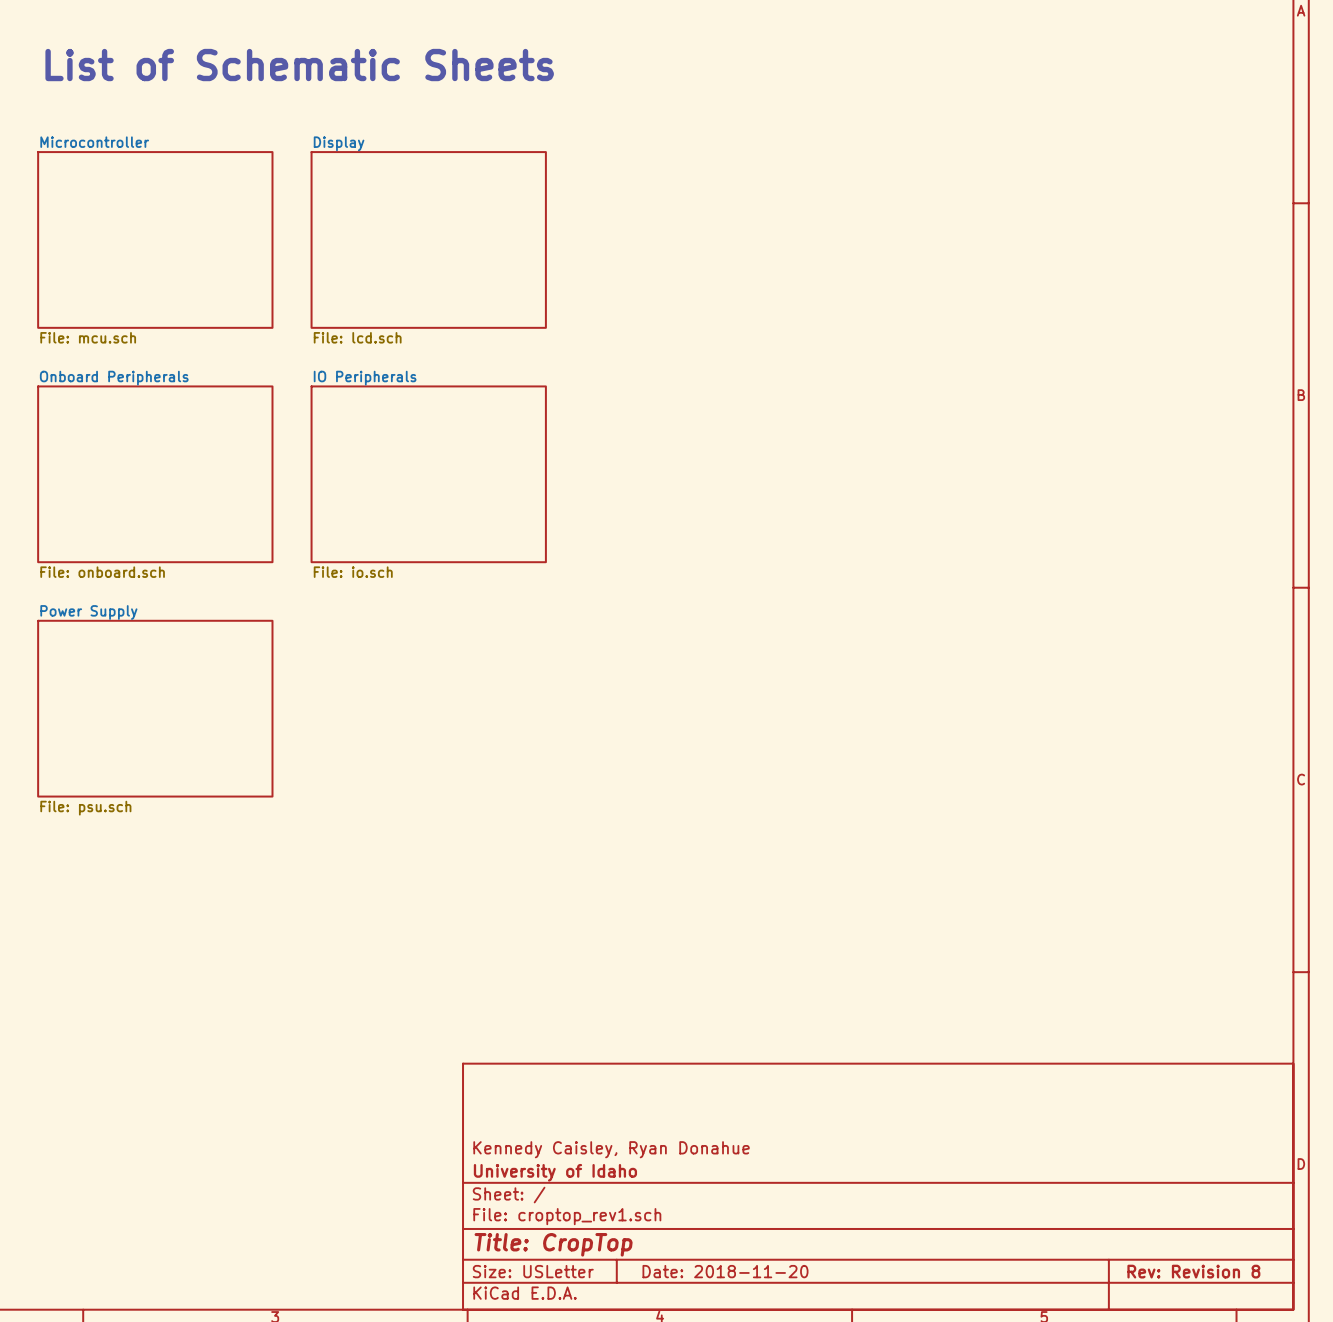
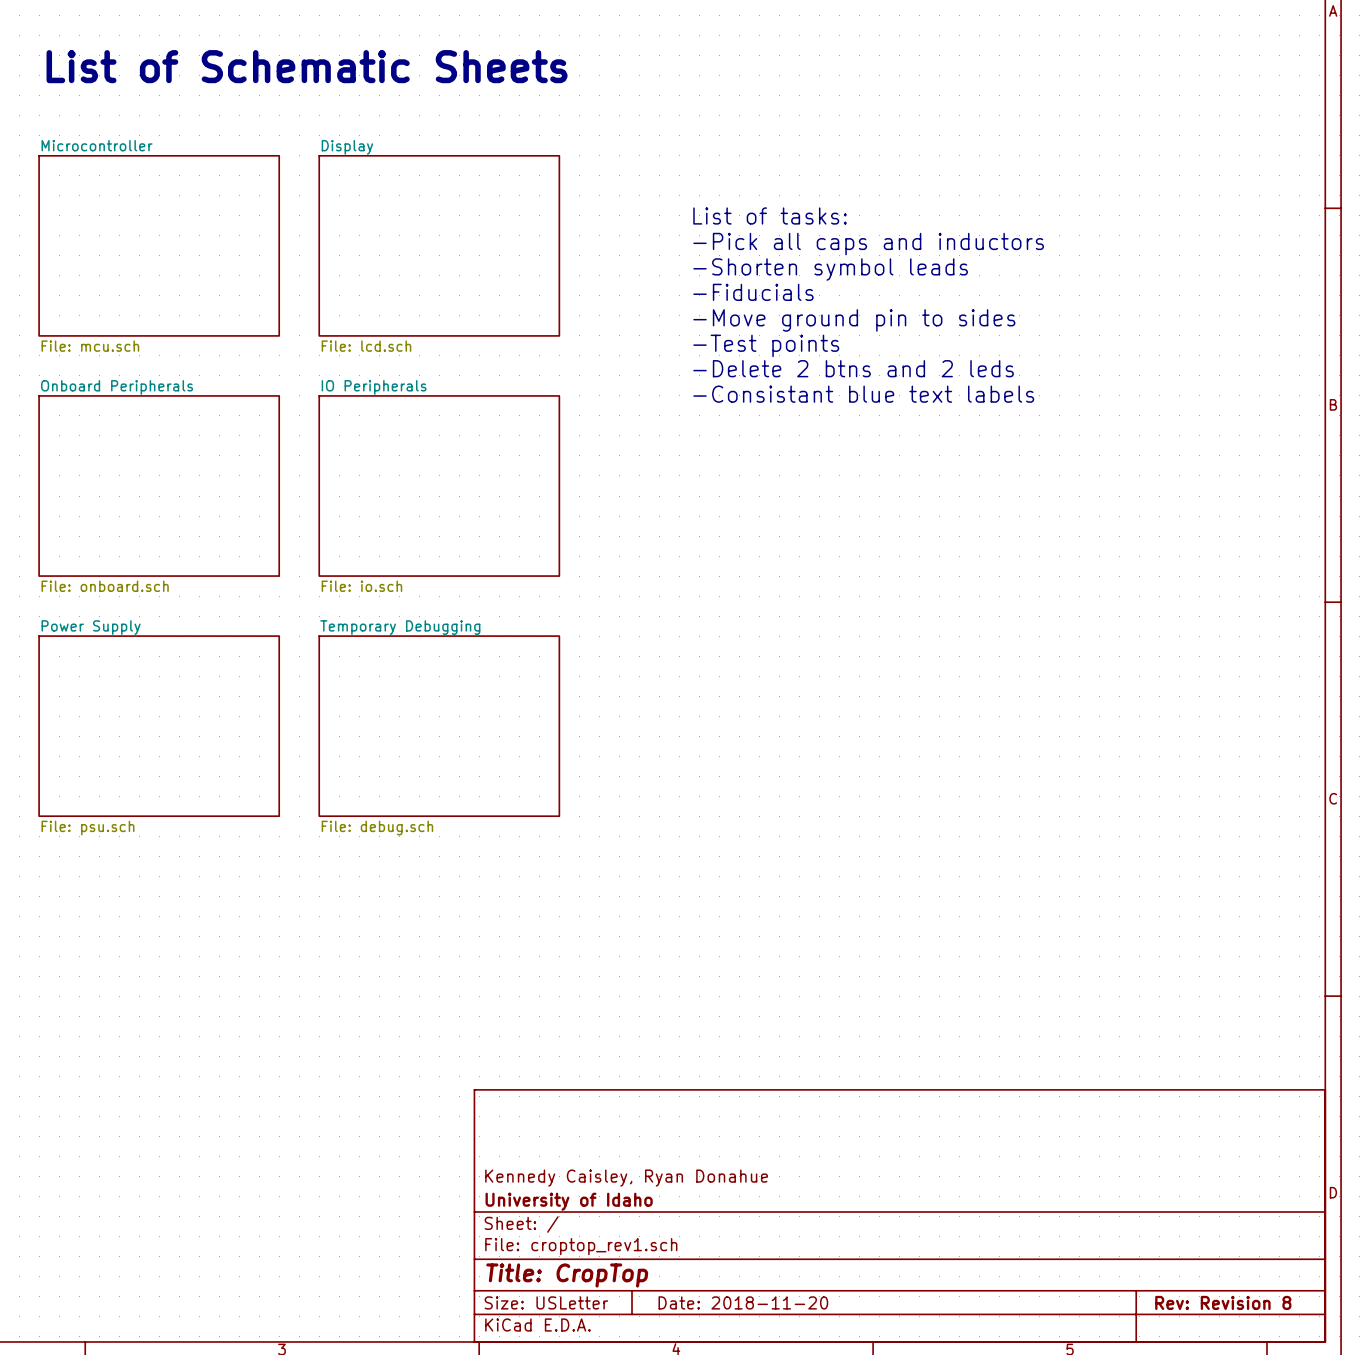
text: none -> List of tasks: (770, 215)
text: none -> -Pick all caps and inductors (868, 244)
text: none -> -Shorten symbol leads (830, 269)
text: none -> -Fiducials (753, 292)
text: none -> -Move ground pin to sides (854, 320)
text: none -> -Test points (766, 345)
text: none -> -Delete 2 btns and 2 leds (853, 368)
text: none -> -Consistant blue text labels (863, 394)
sheet Temporary Debugging: none -> File: debug.sch (439, 726)

